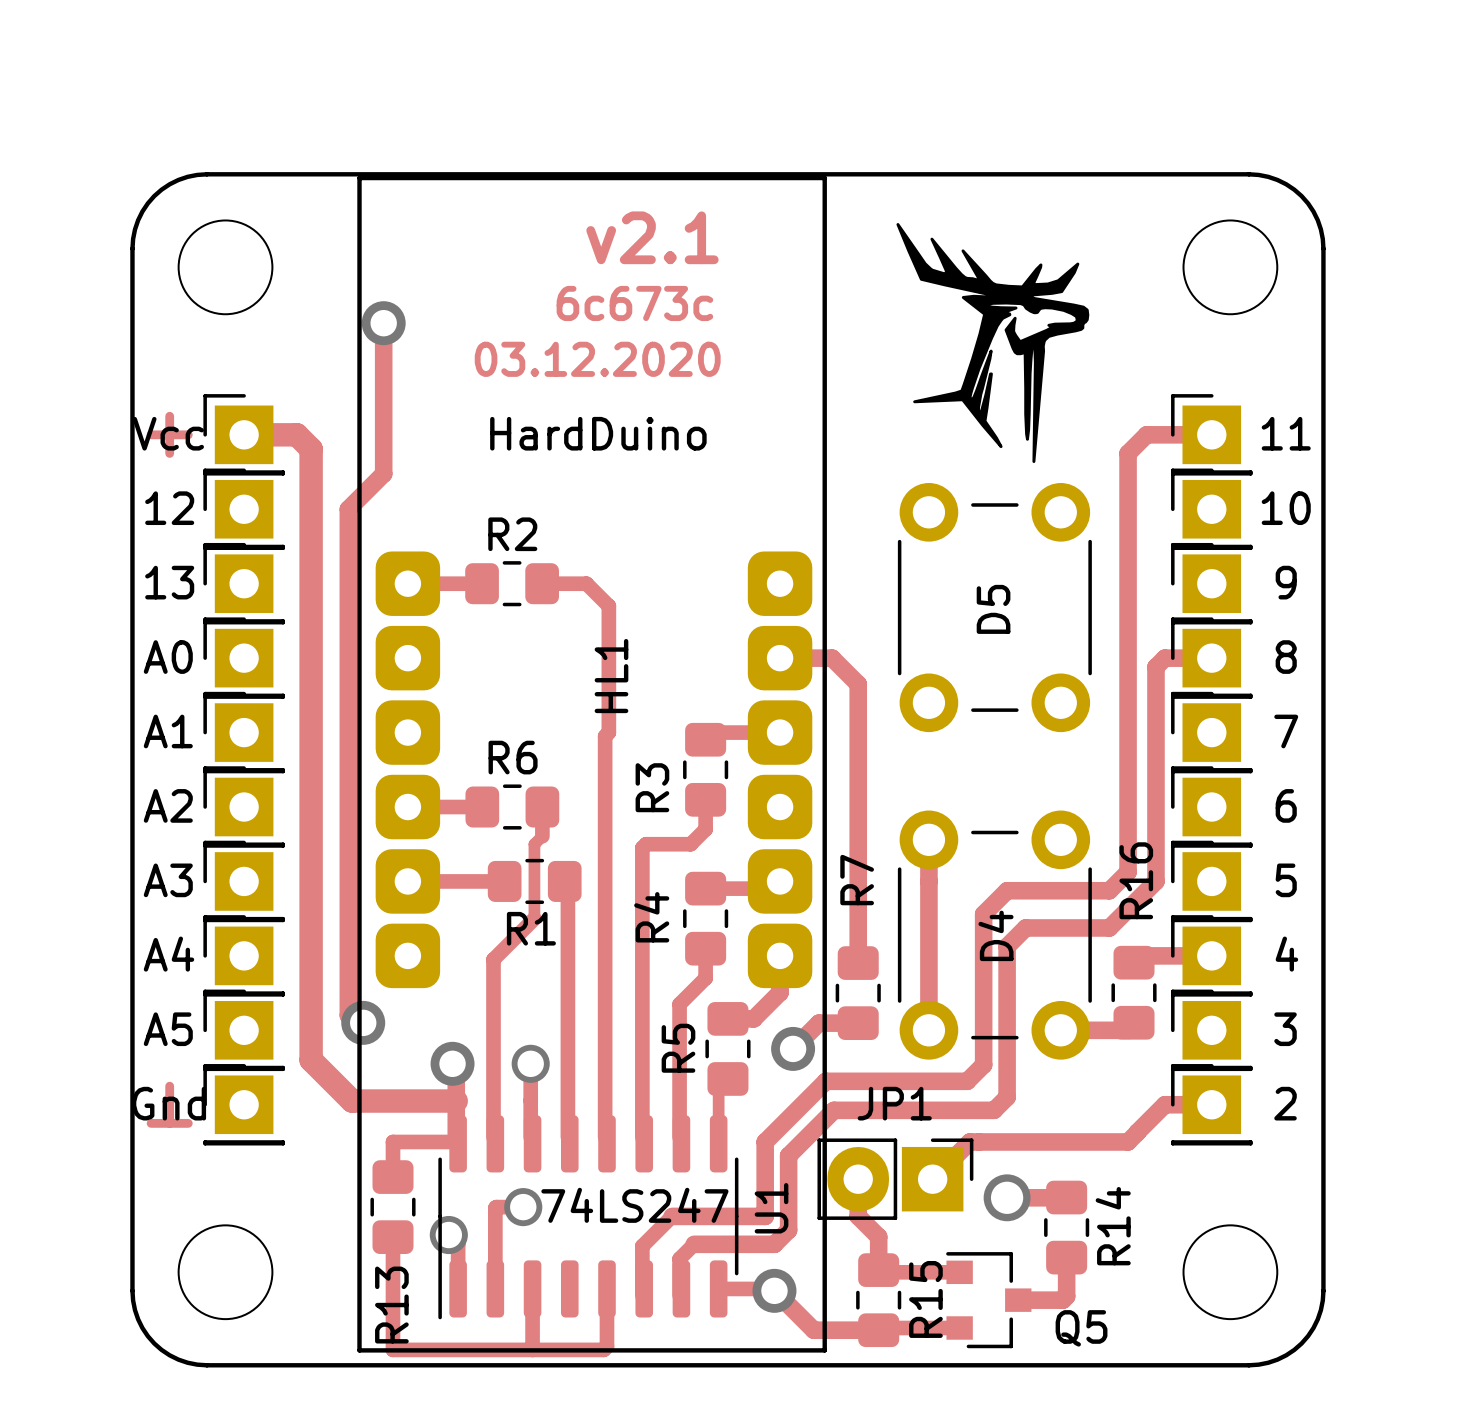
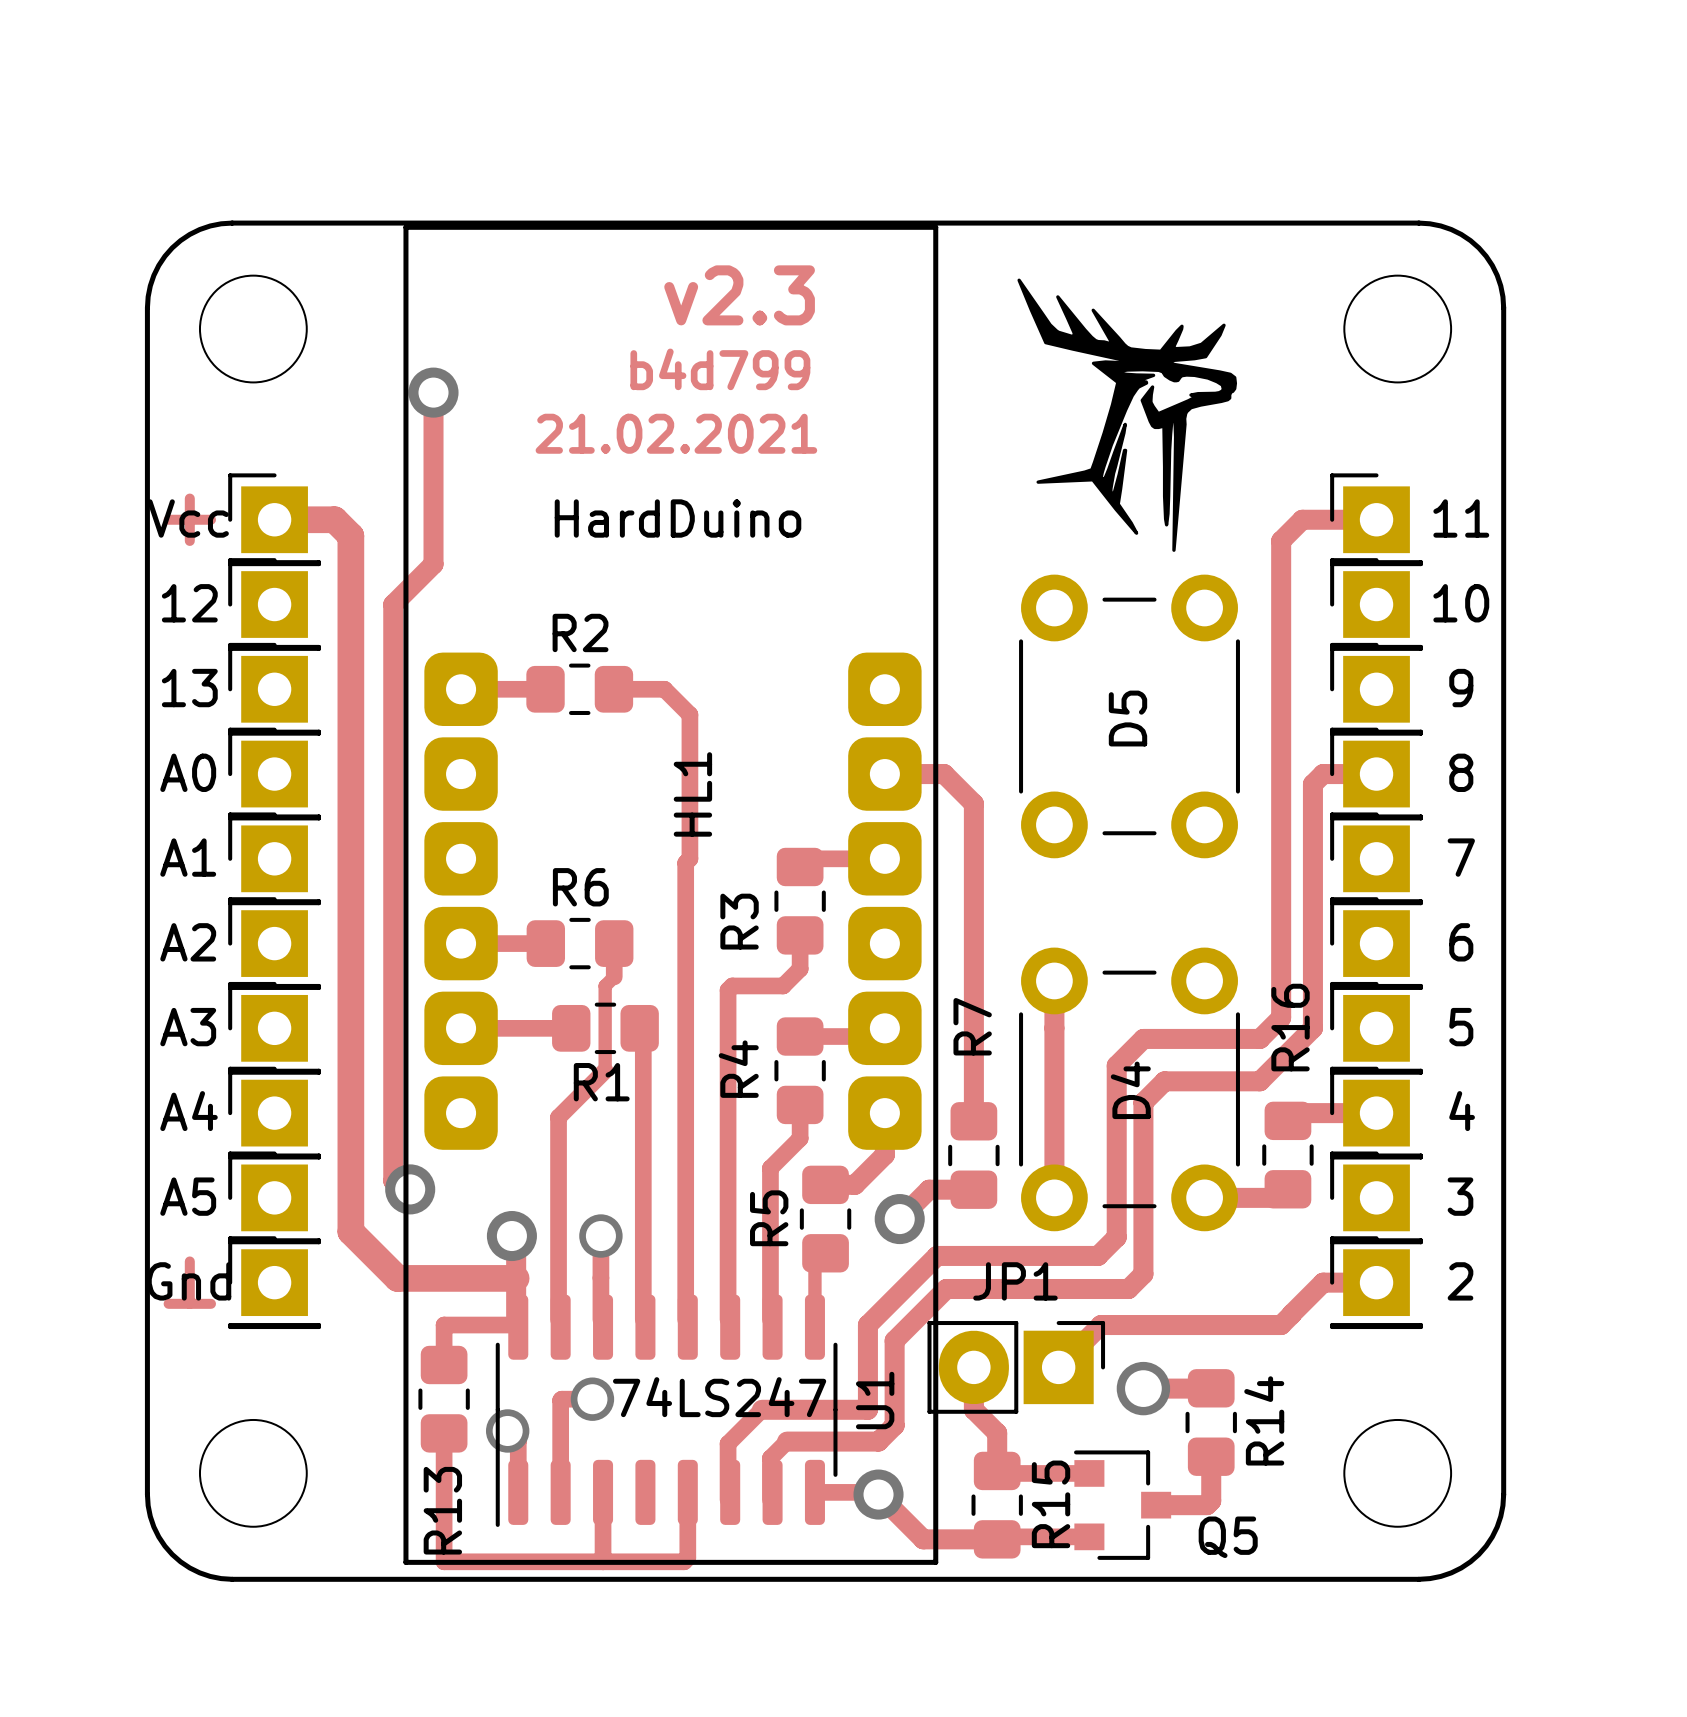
text: v2.1 (652, 237) -> v2.3 (739, 295)
text: 6c673c (634, 303) -> b4d799 (720, 369)
text: 03.12.2020 (597, 359) -> 21.02.2021 (676, 433)

